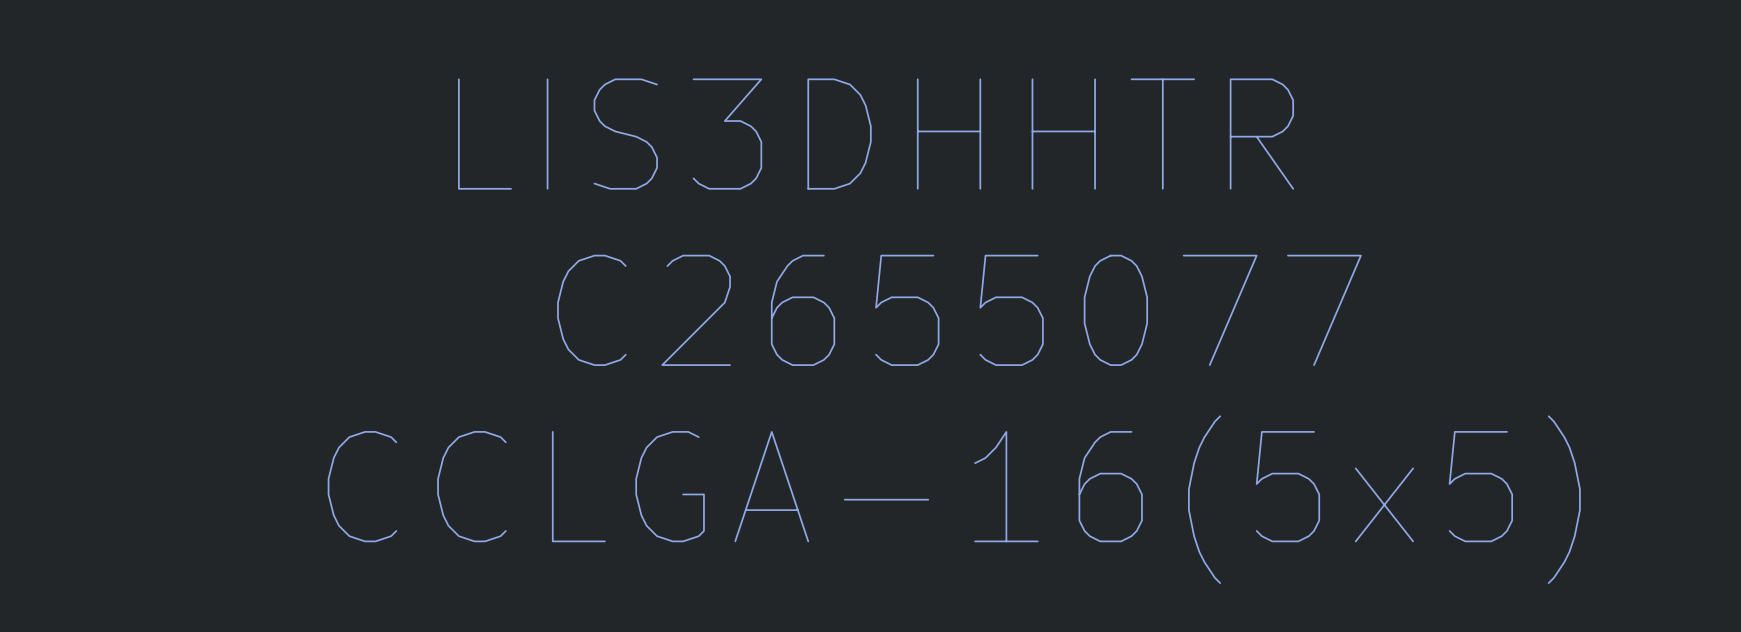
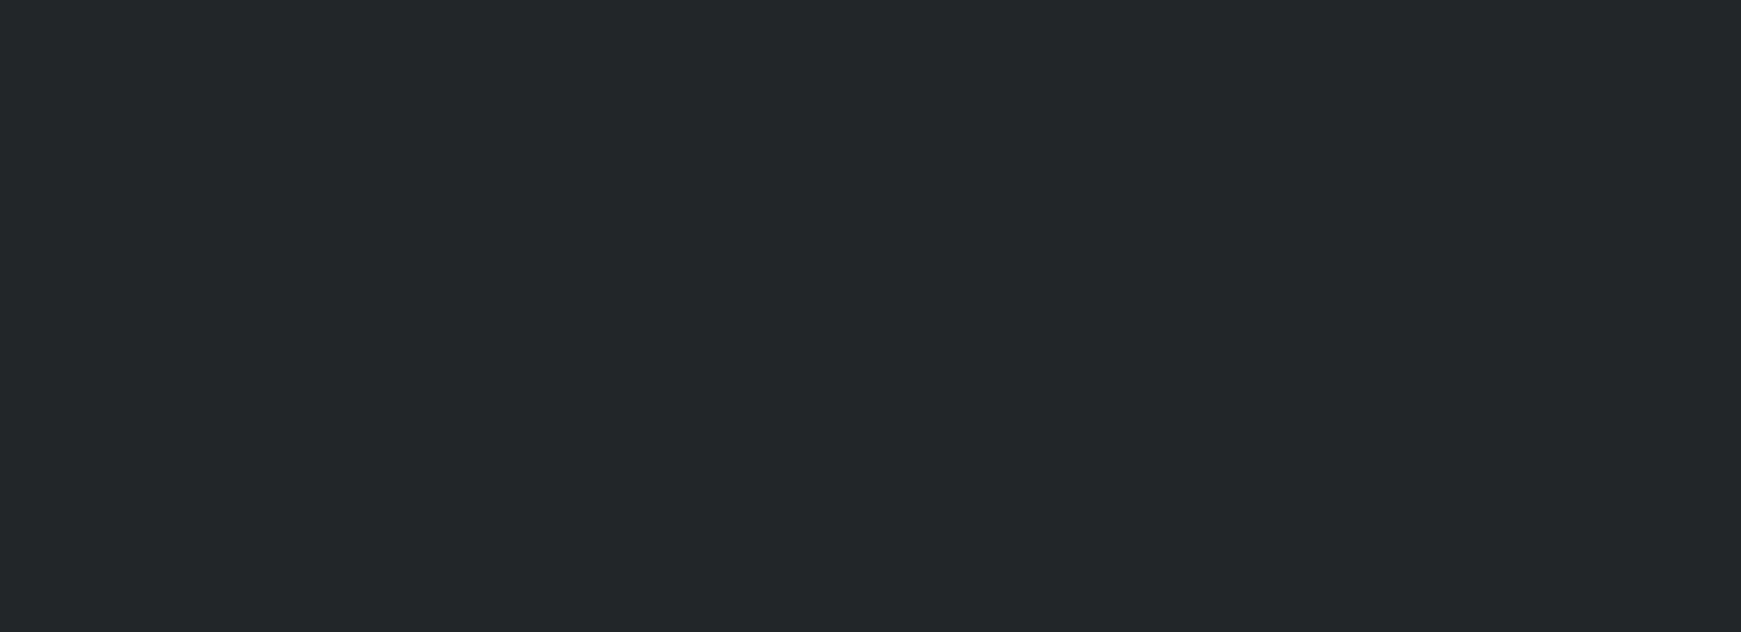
text: LIS3DHHTR (876, 134) -> none
text: C2655077 (959, 310) -> none
text: CCLGA-16(5x5) (954, 499) -> none

